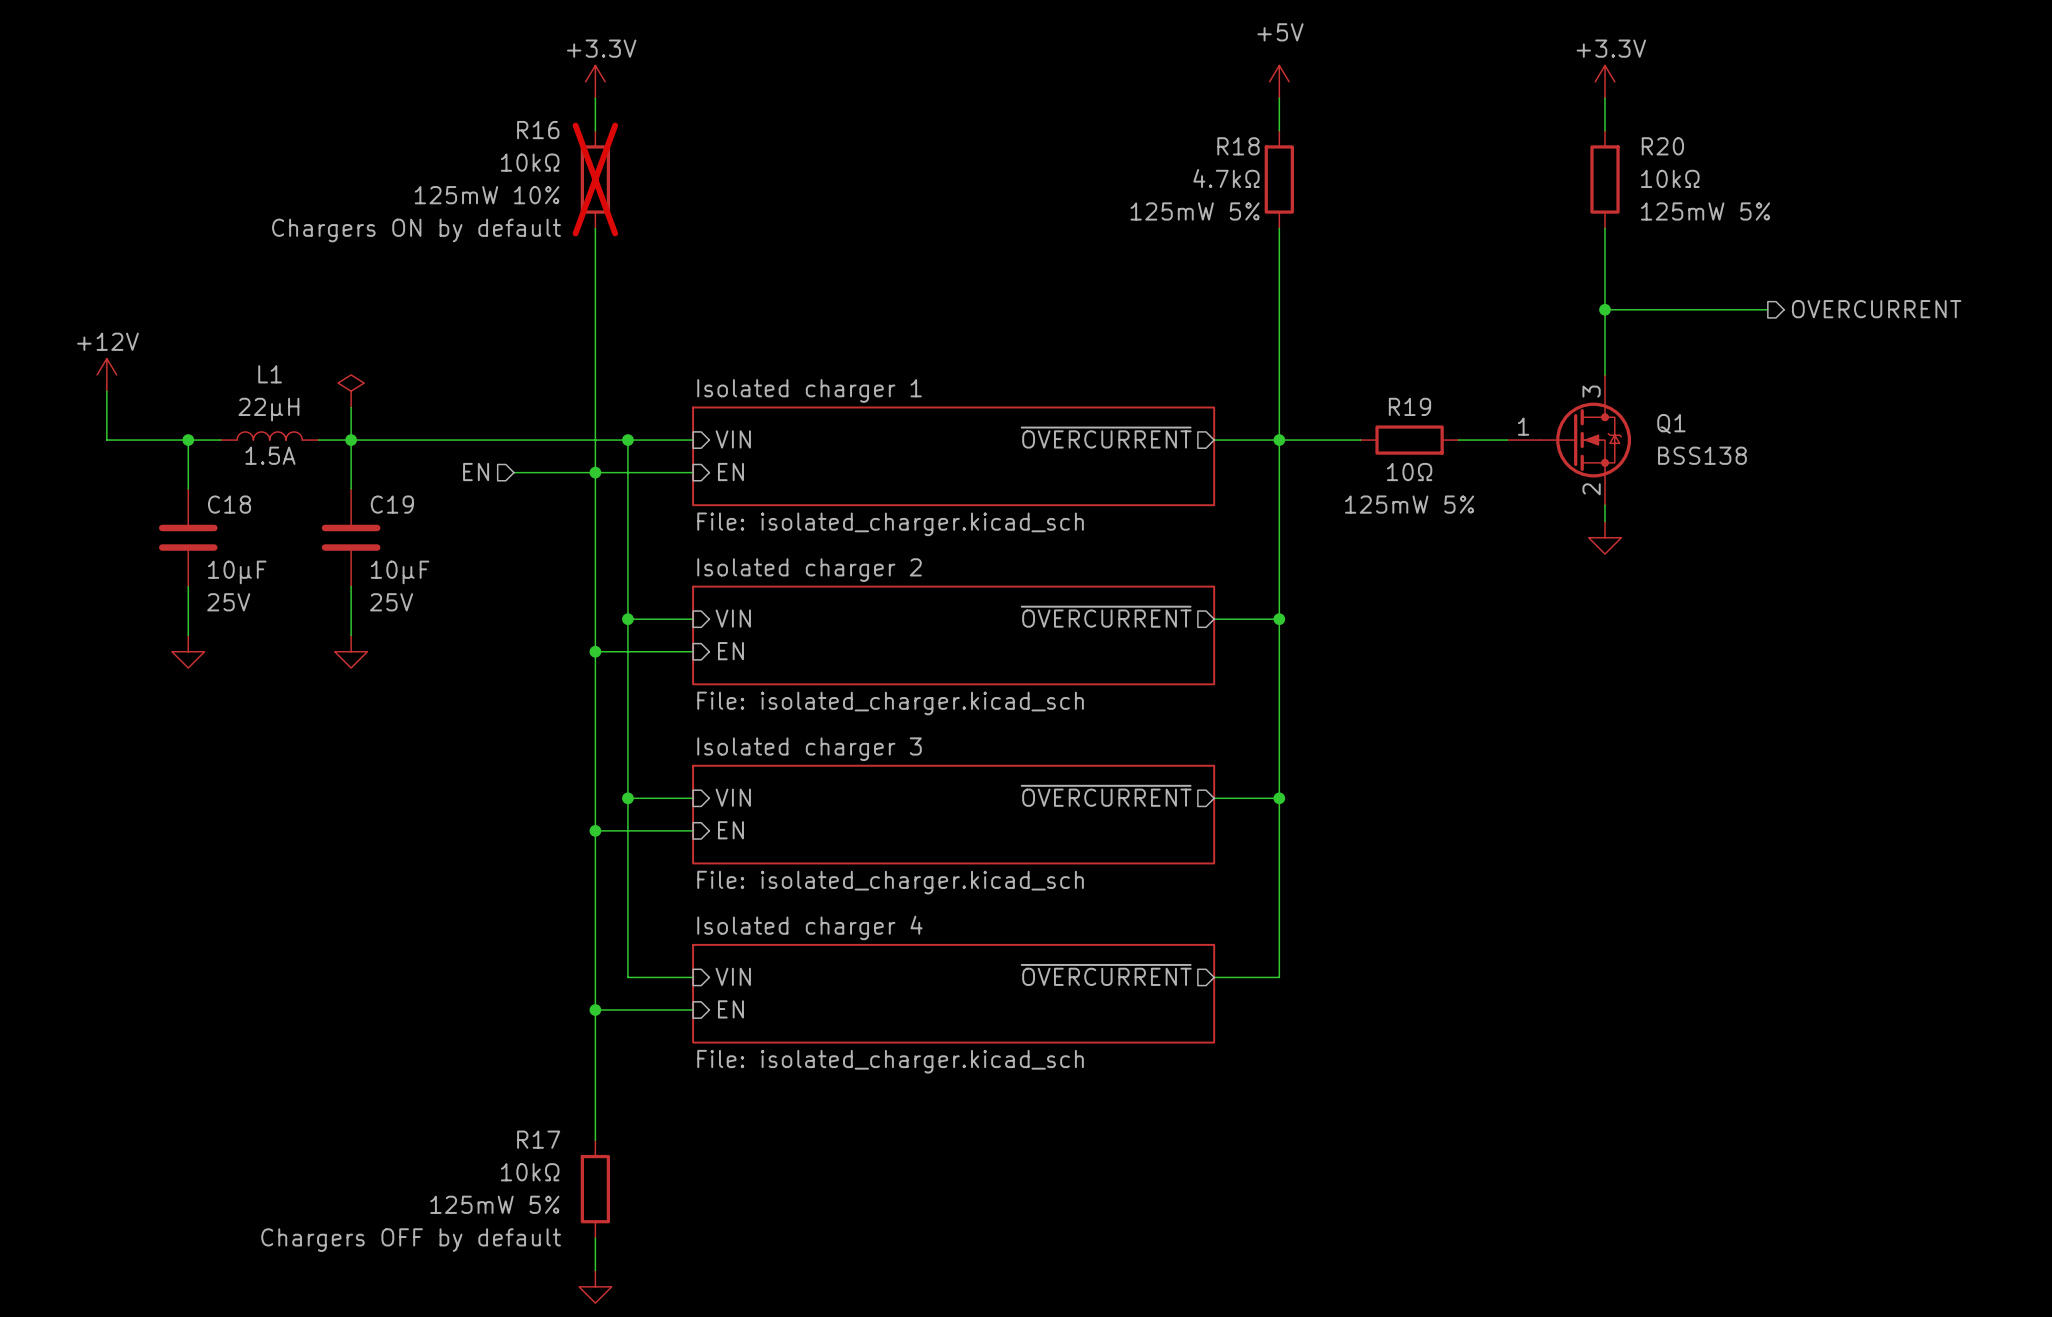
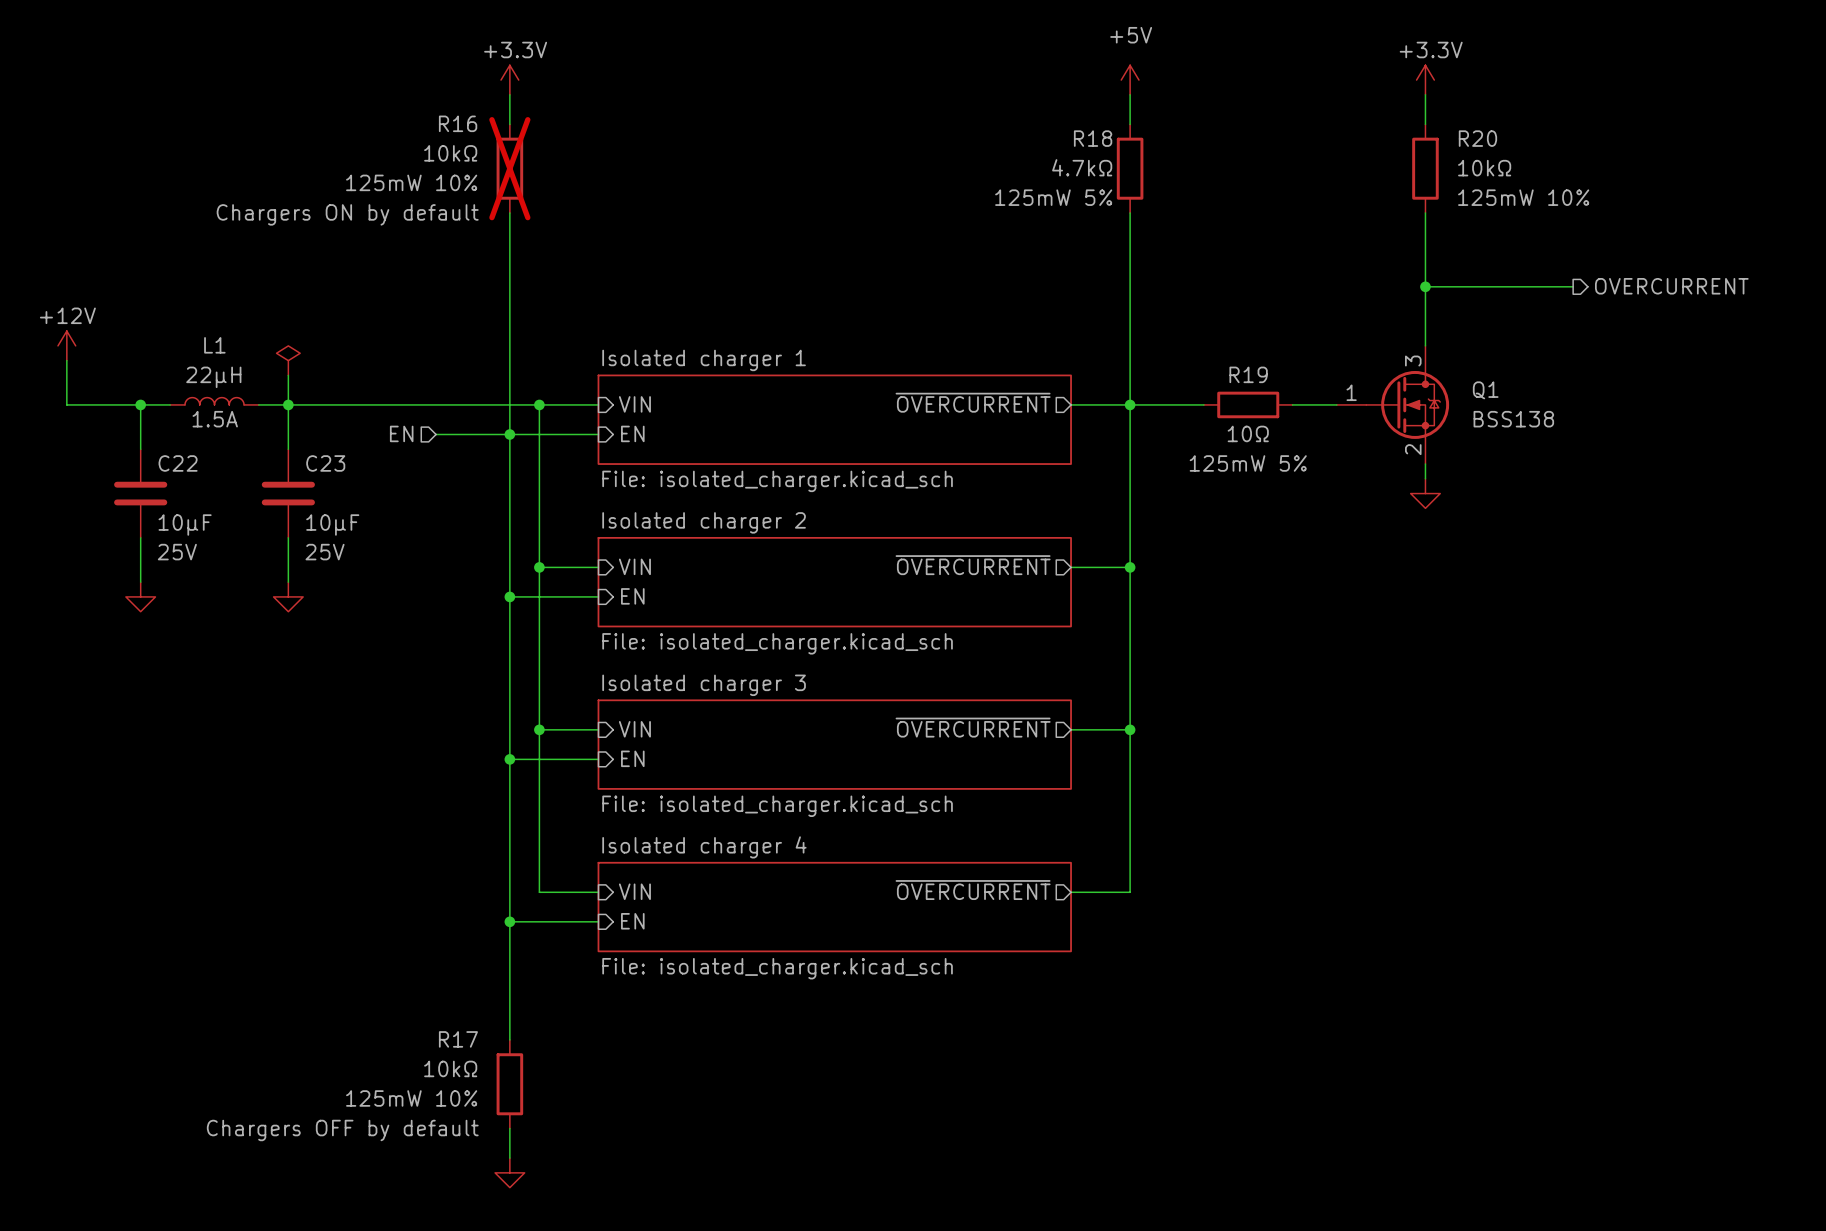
R20 text: 125mW 5% (1705, 211) -> 125mW 10% (1523, 197)
C18 name: C18 (229, 504) -> C22 (178, 463)
C19 name: C19 (392, 504) -> C23 (325, 463)
R17 text: 125mW 5% (494, 1204) -> 125mW 10% (411, 1098)

